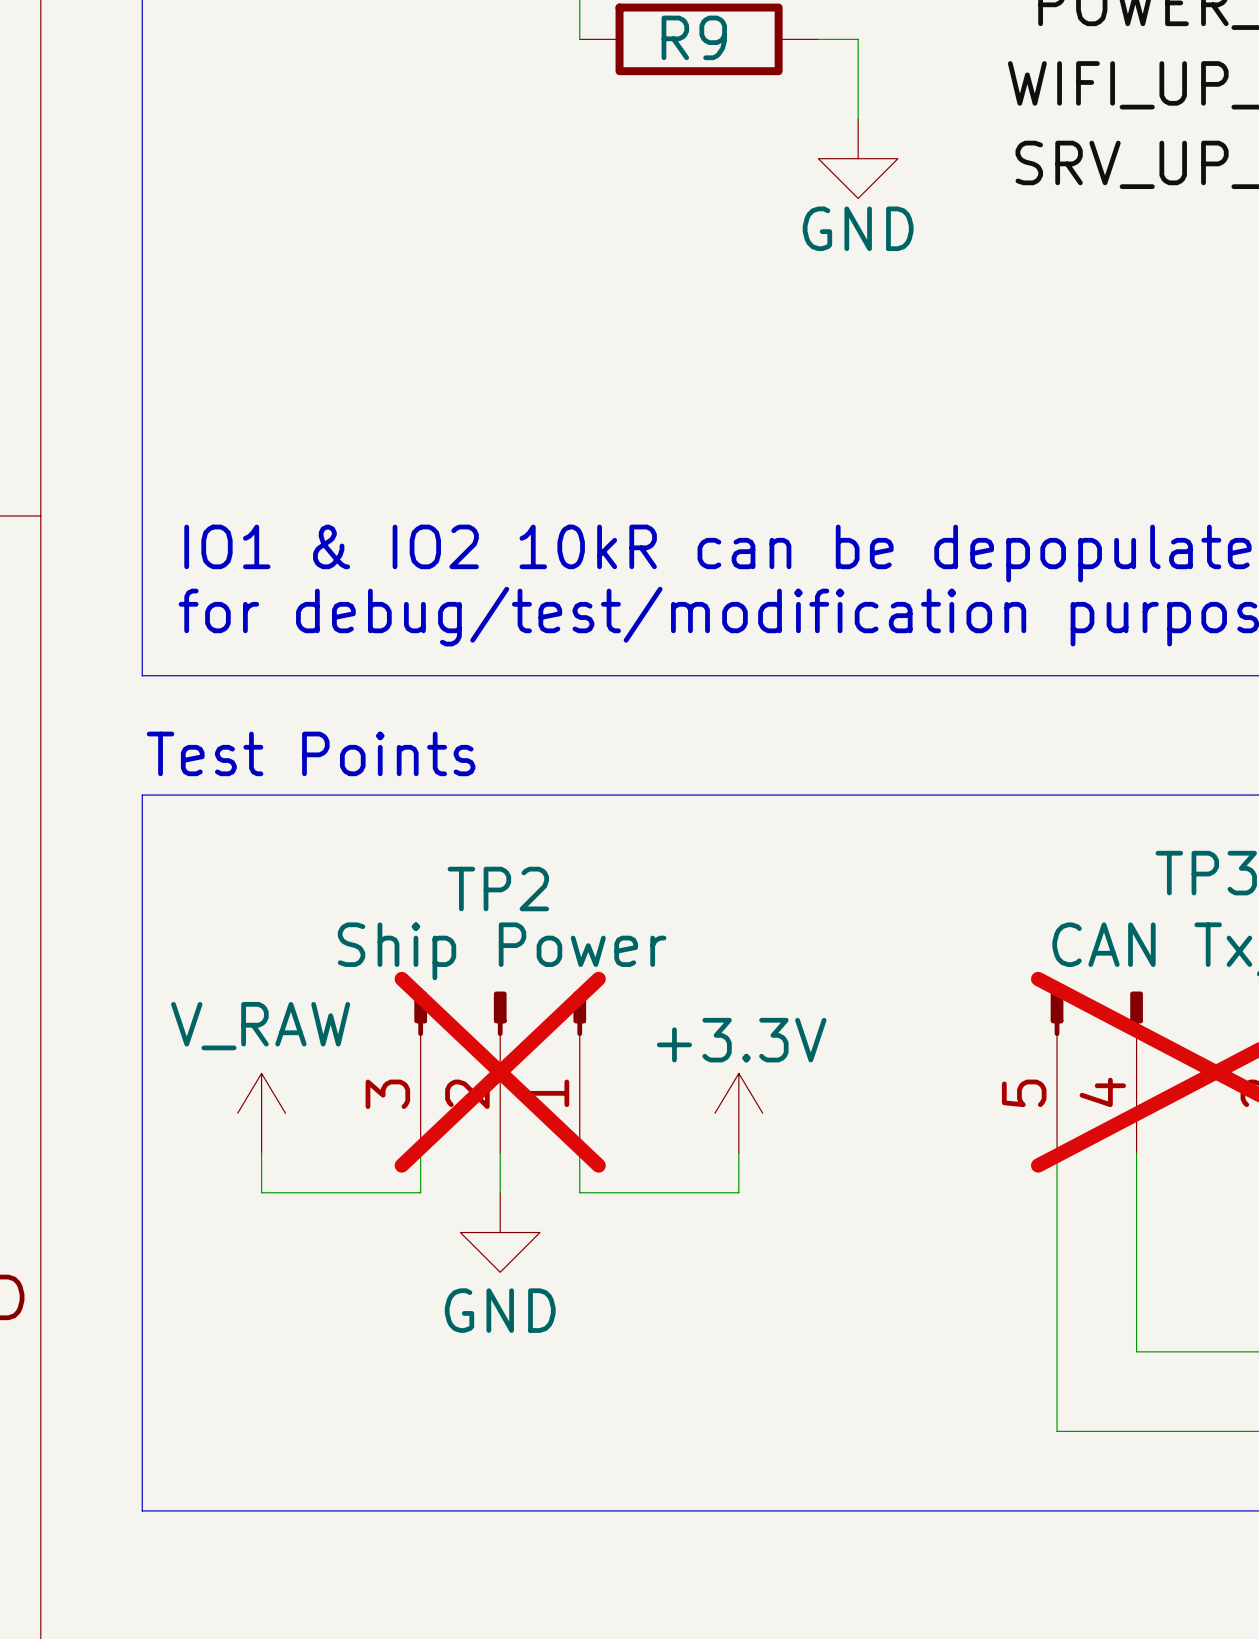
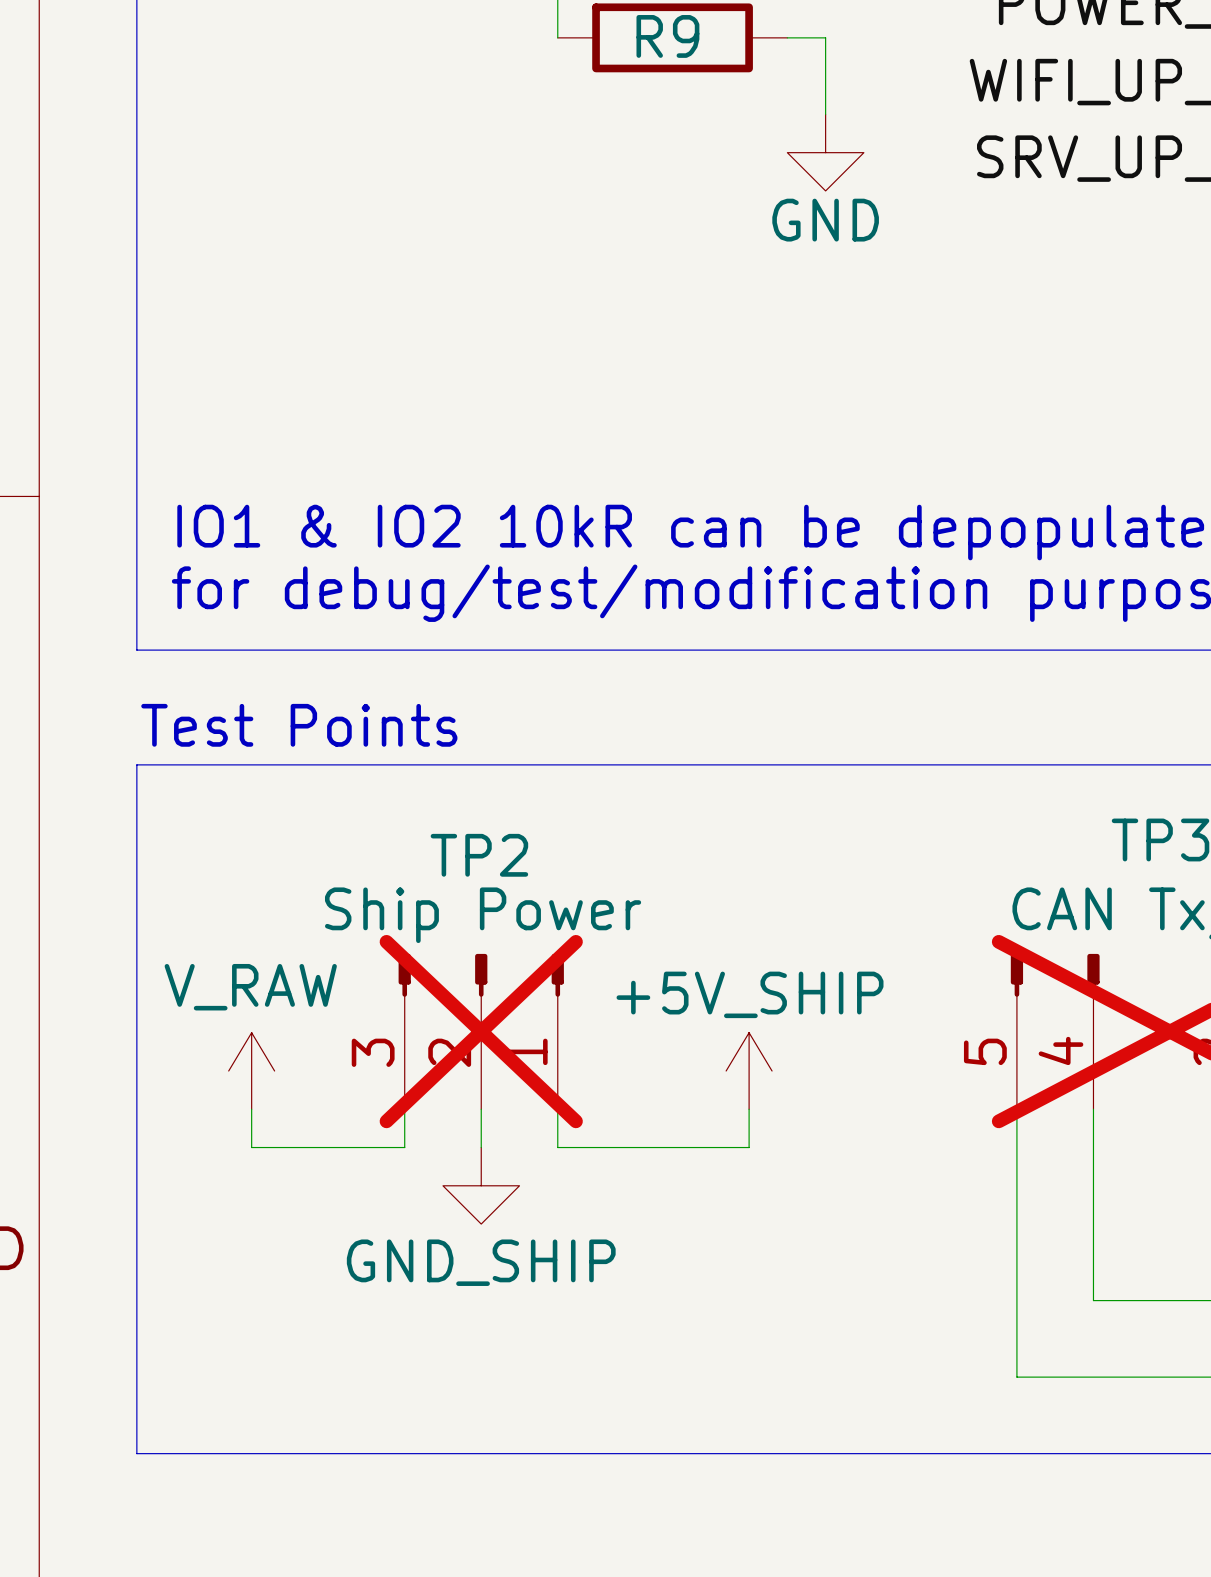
power symbol: +3.3V (738, 1113) -> none
power symbol: none -> +5V_SHIP (749, 1071)
wire: (738, 1152) (738, 1192) -> (749, 1109) (749, 1147) (710, 1147)
power symbol: GND (500, 1232) -> GND_SHIP (481, 1185)

